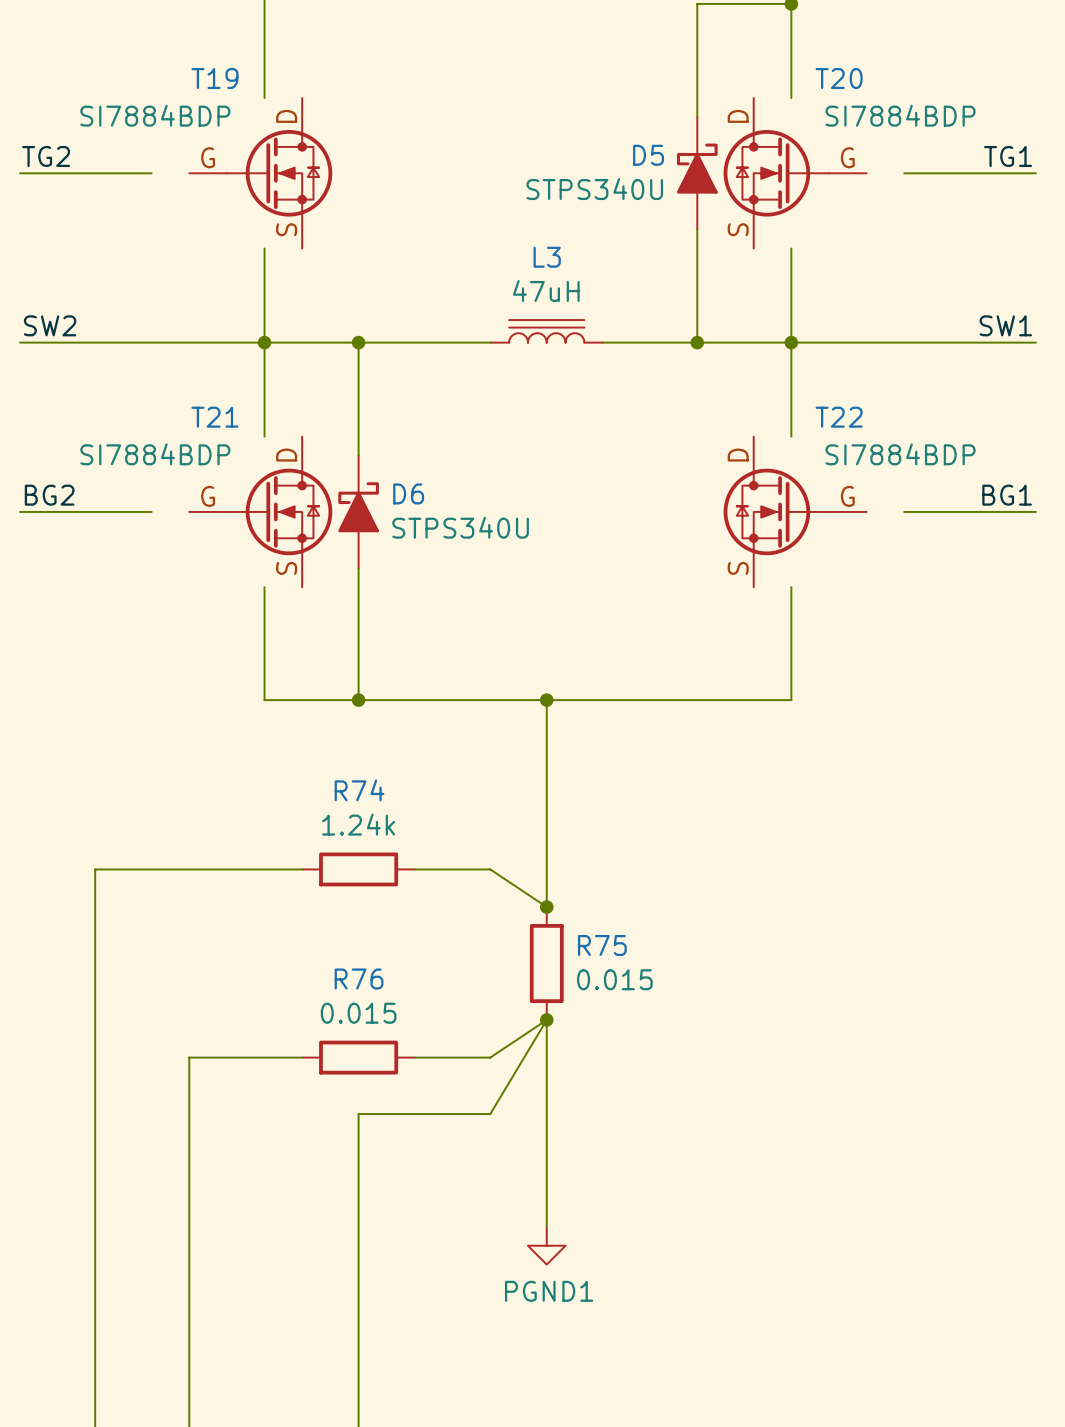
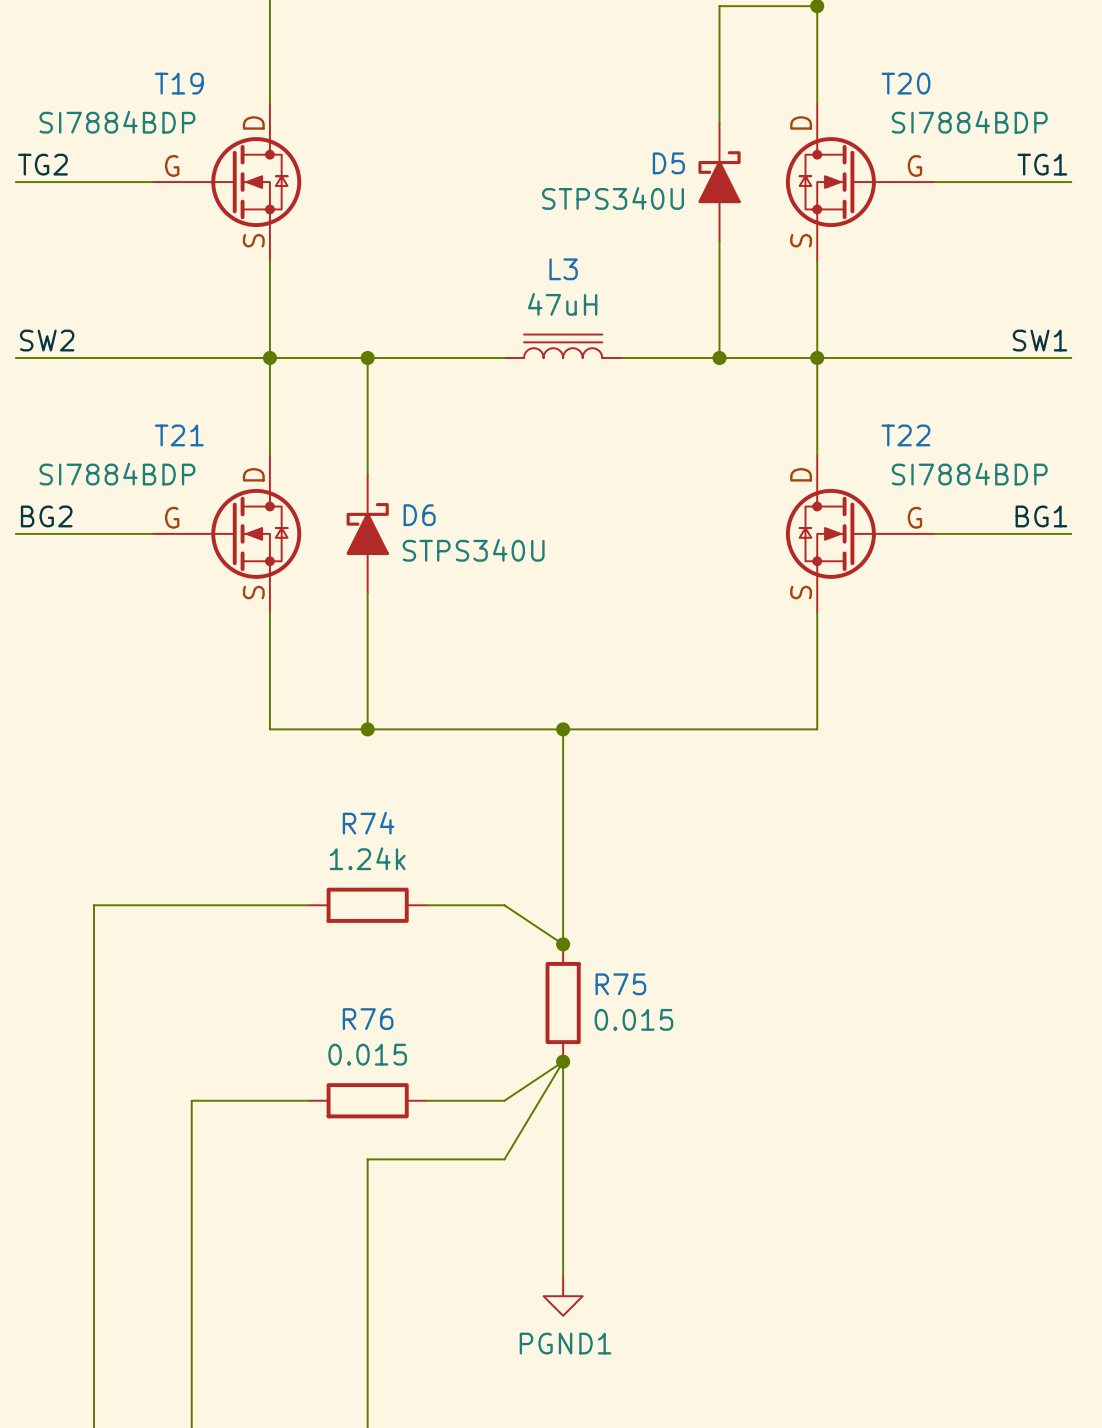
T19 position: (260, 173) -> (226, 182)
T20 position: (795, 173) -> (860, 182)
T21 position: (260, 511) -> (226, 533)
T22 position: (795, 511) -> (860, 533)

